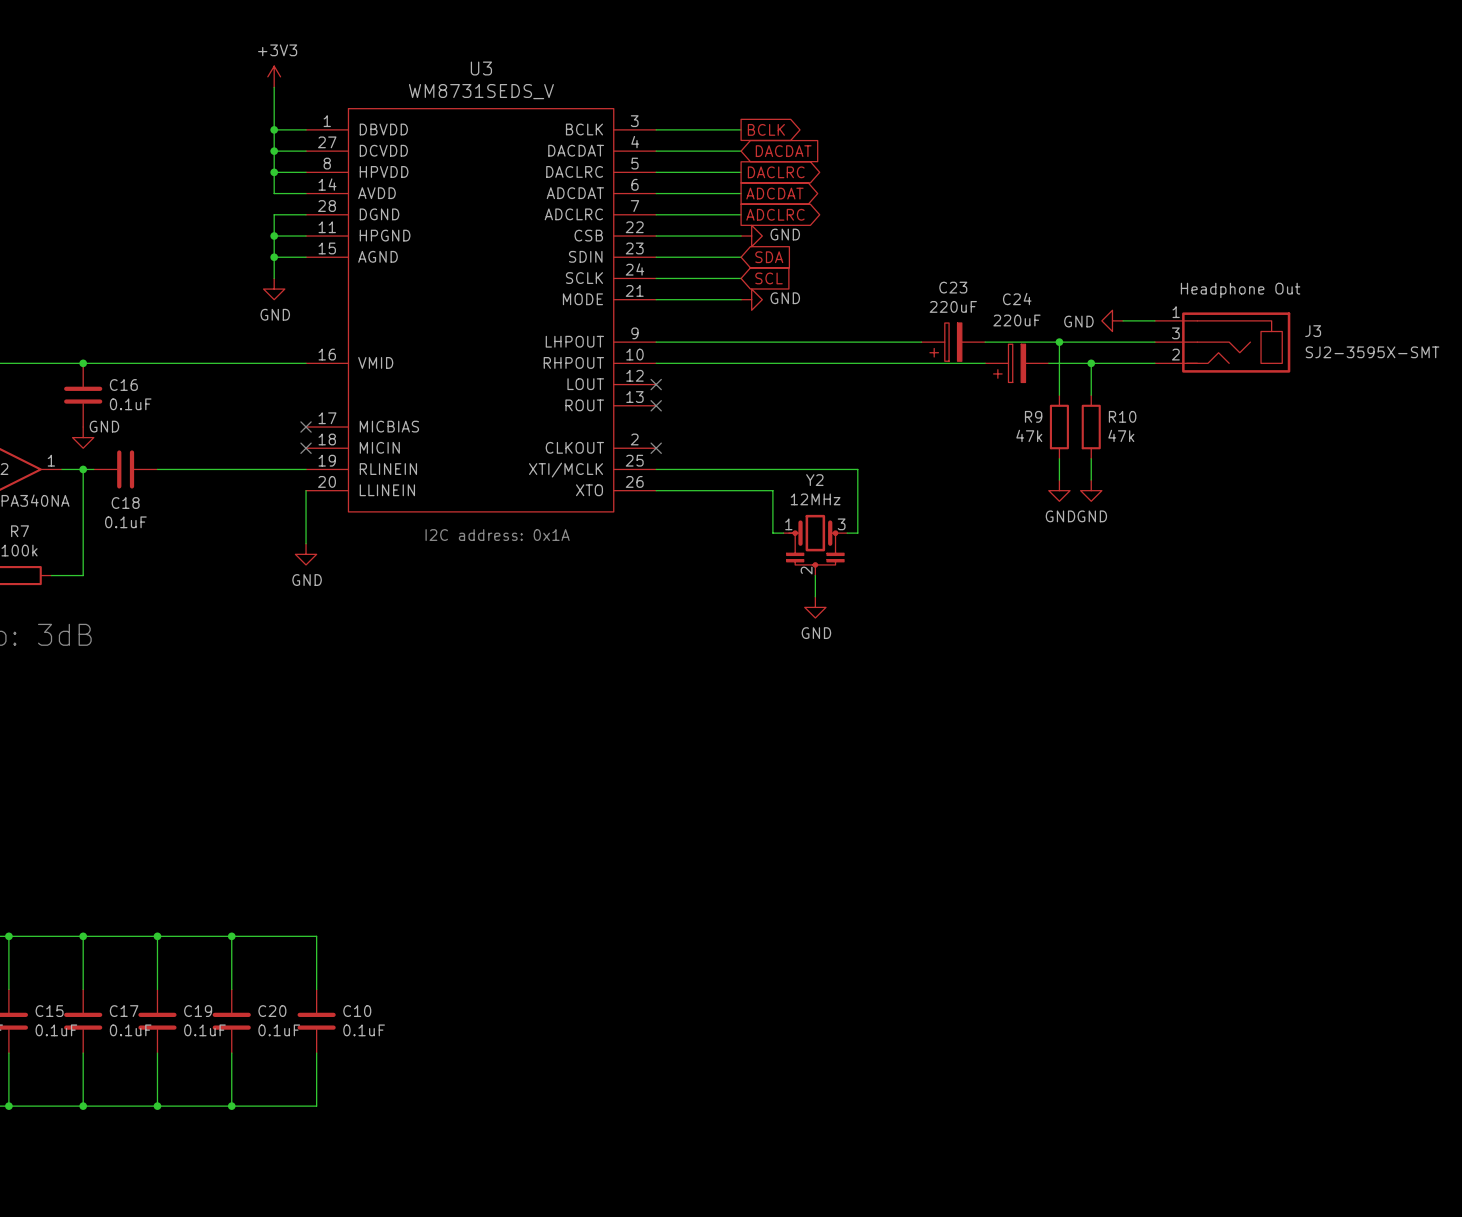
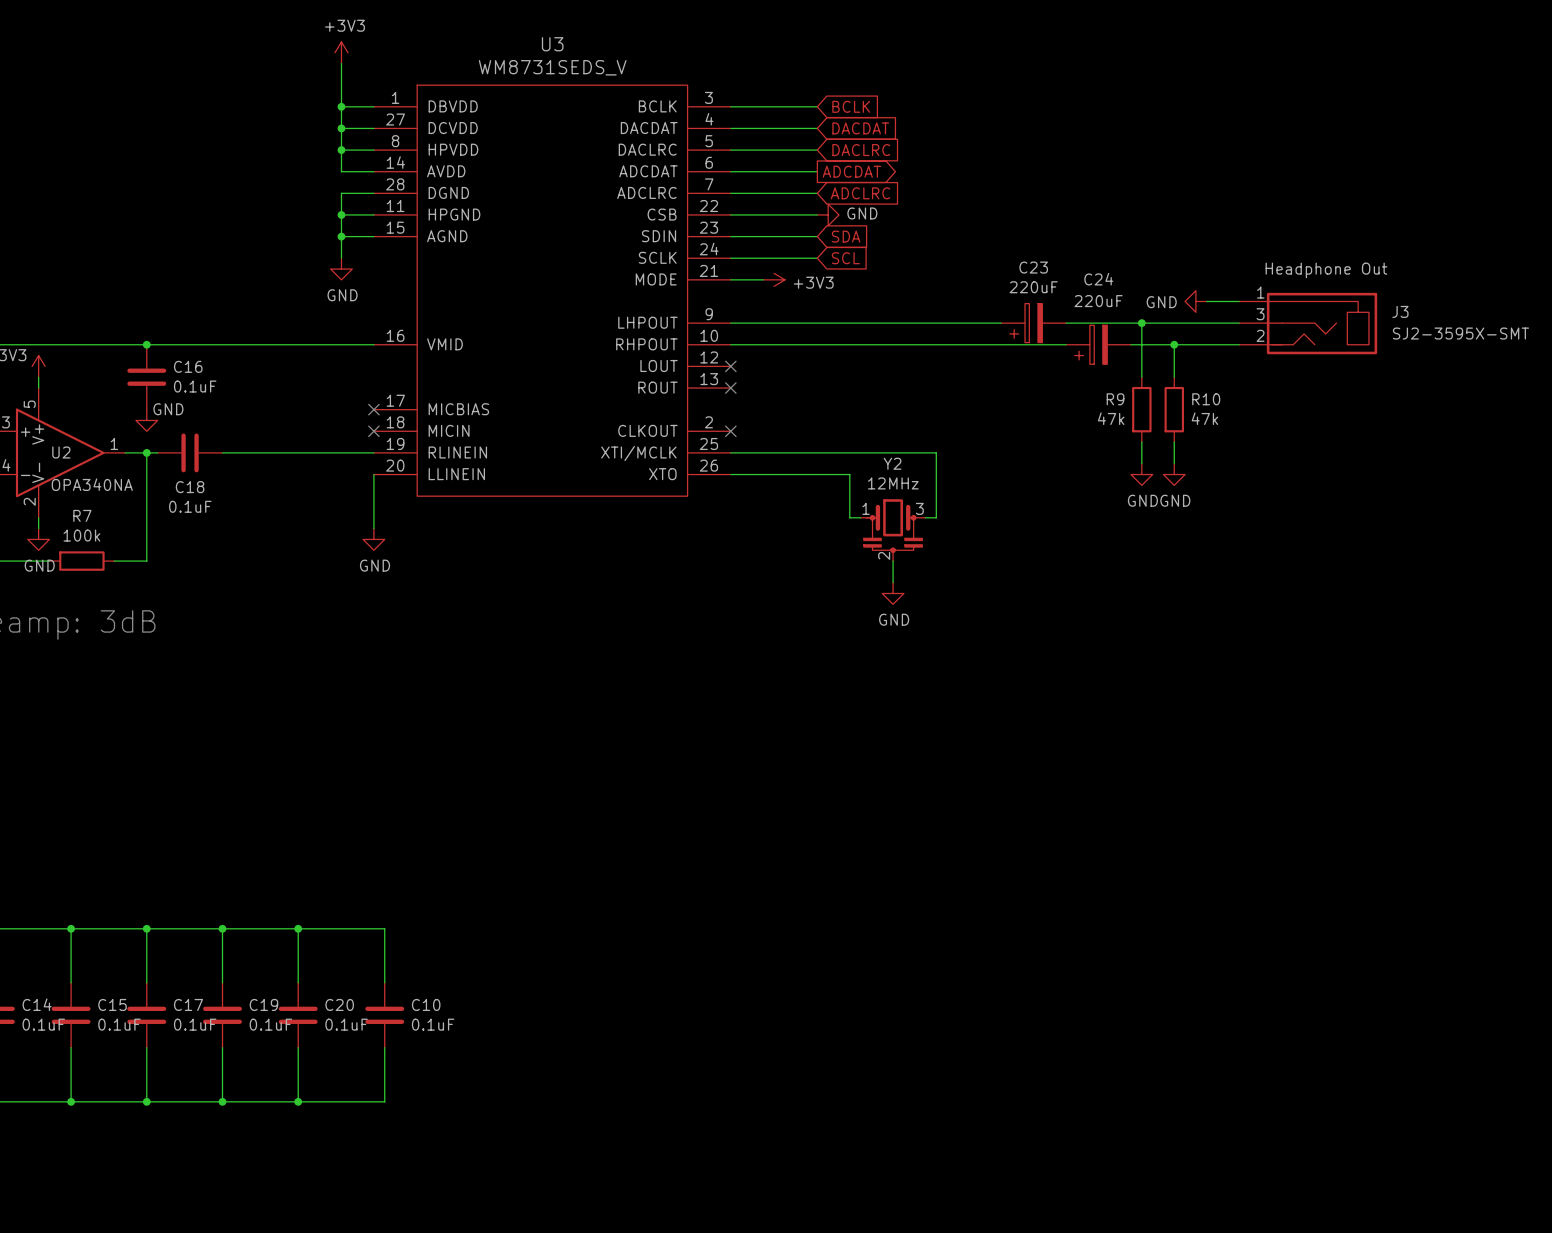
global label shape: output (766, 129) -> input (851, 106)
global label shape: output (776, 172) -> input (861, 150)
global label shape: output (775, 214) -> input (860, 193)
wire: (688, 299) (741, 299) -> none
power symbol: none -> +3V3 (774, 279)
power symbol: GND (751, 299) -> none
text: I2C address: 0x1A (497, 535) -> none

